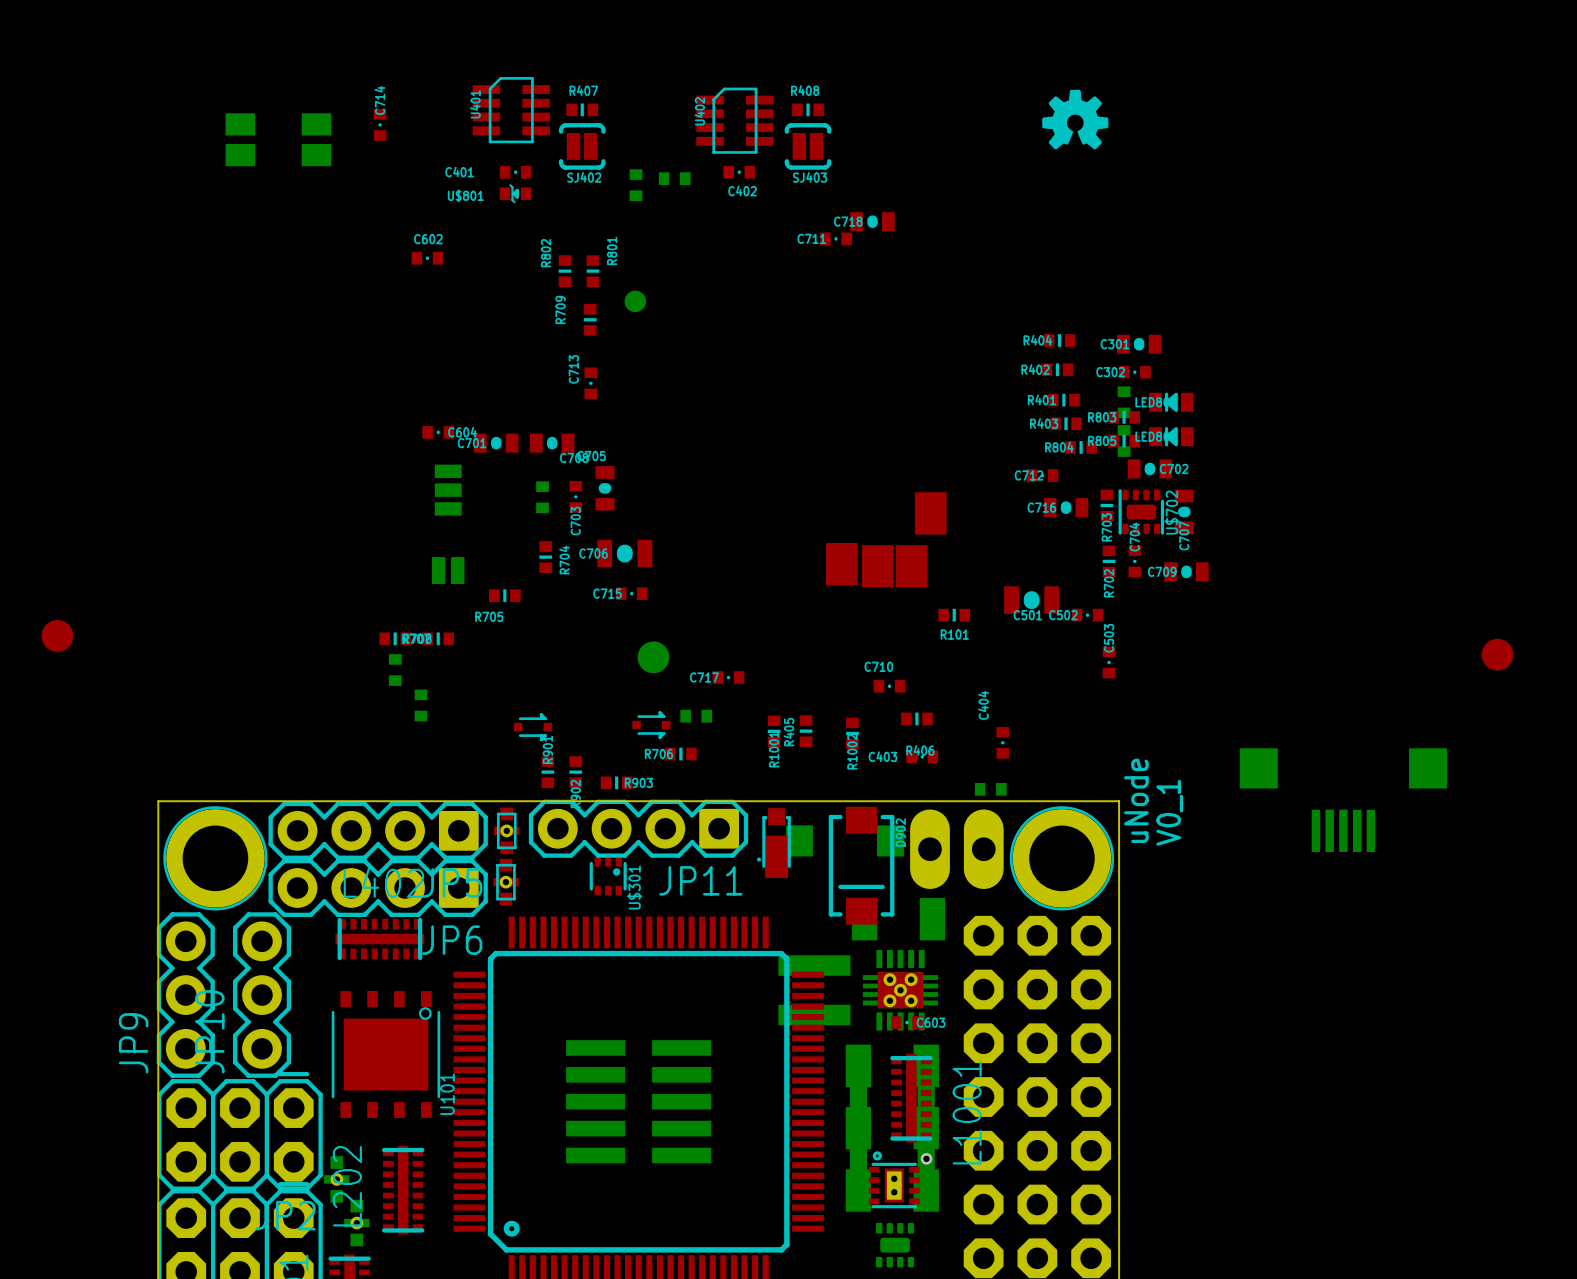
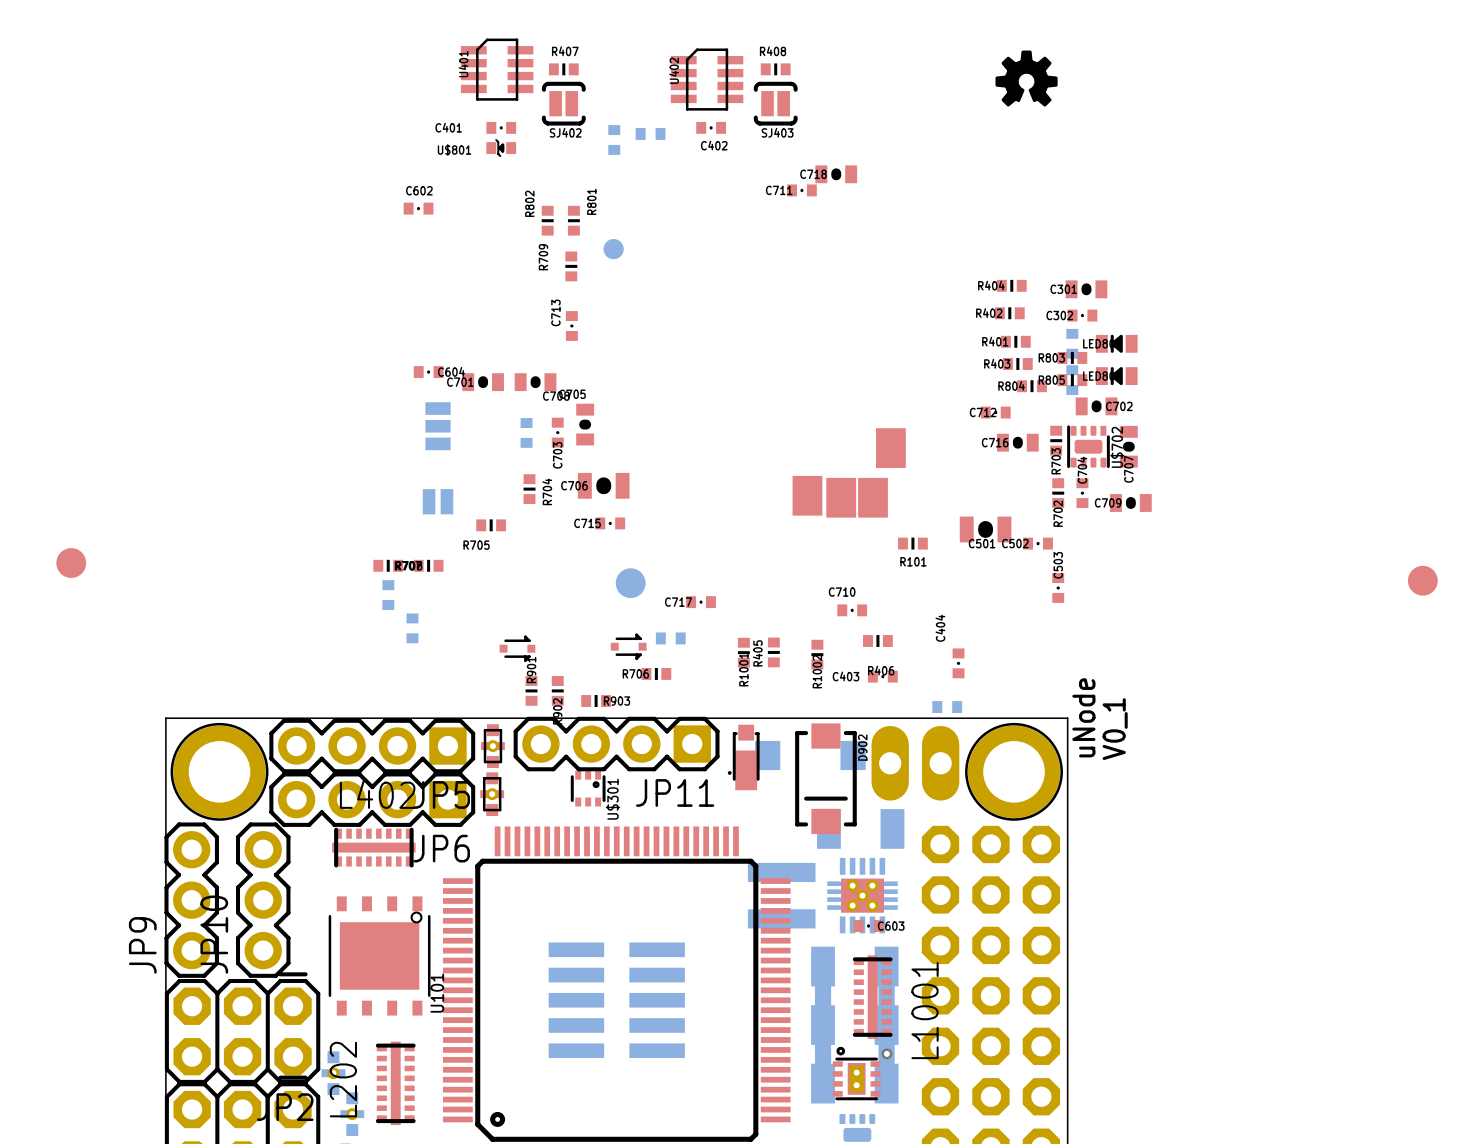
C714: (380, 124) -> none
part: (278, 139) -> none
part: (1343, 800) -> none

